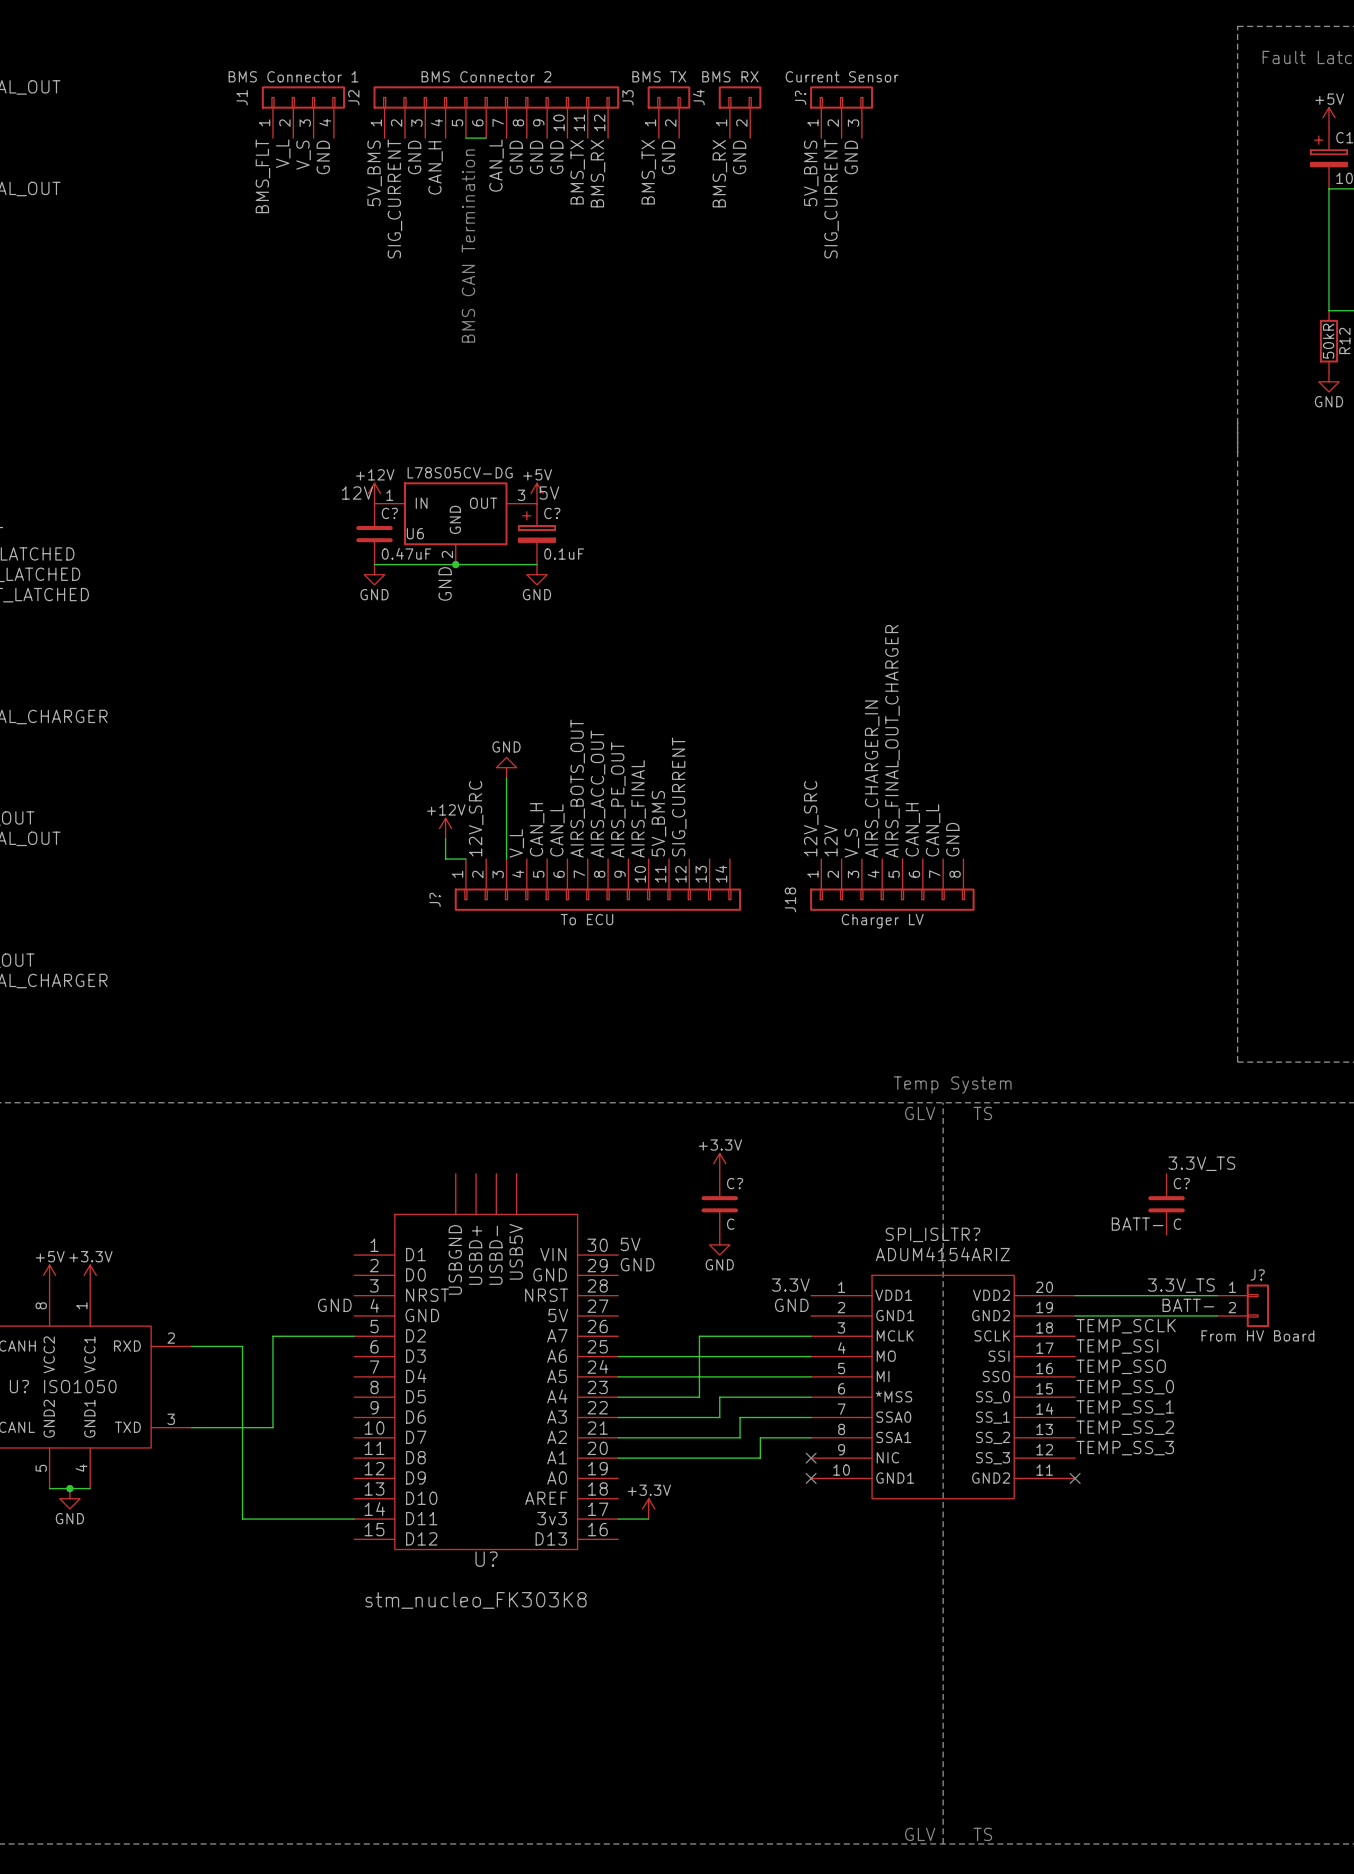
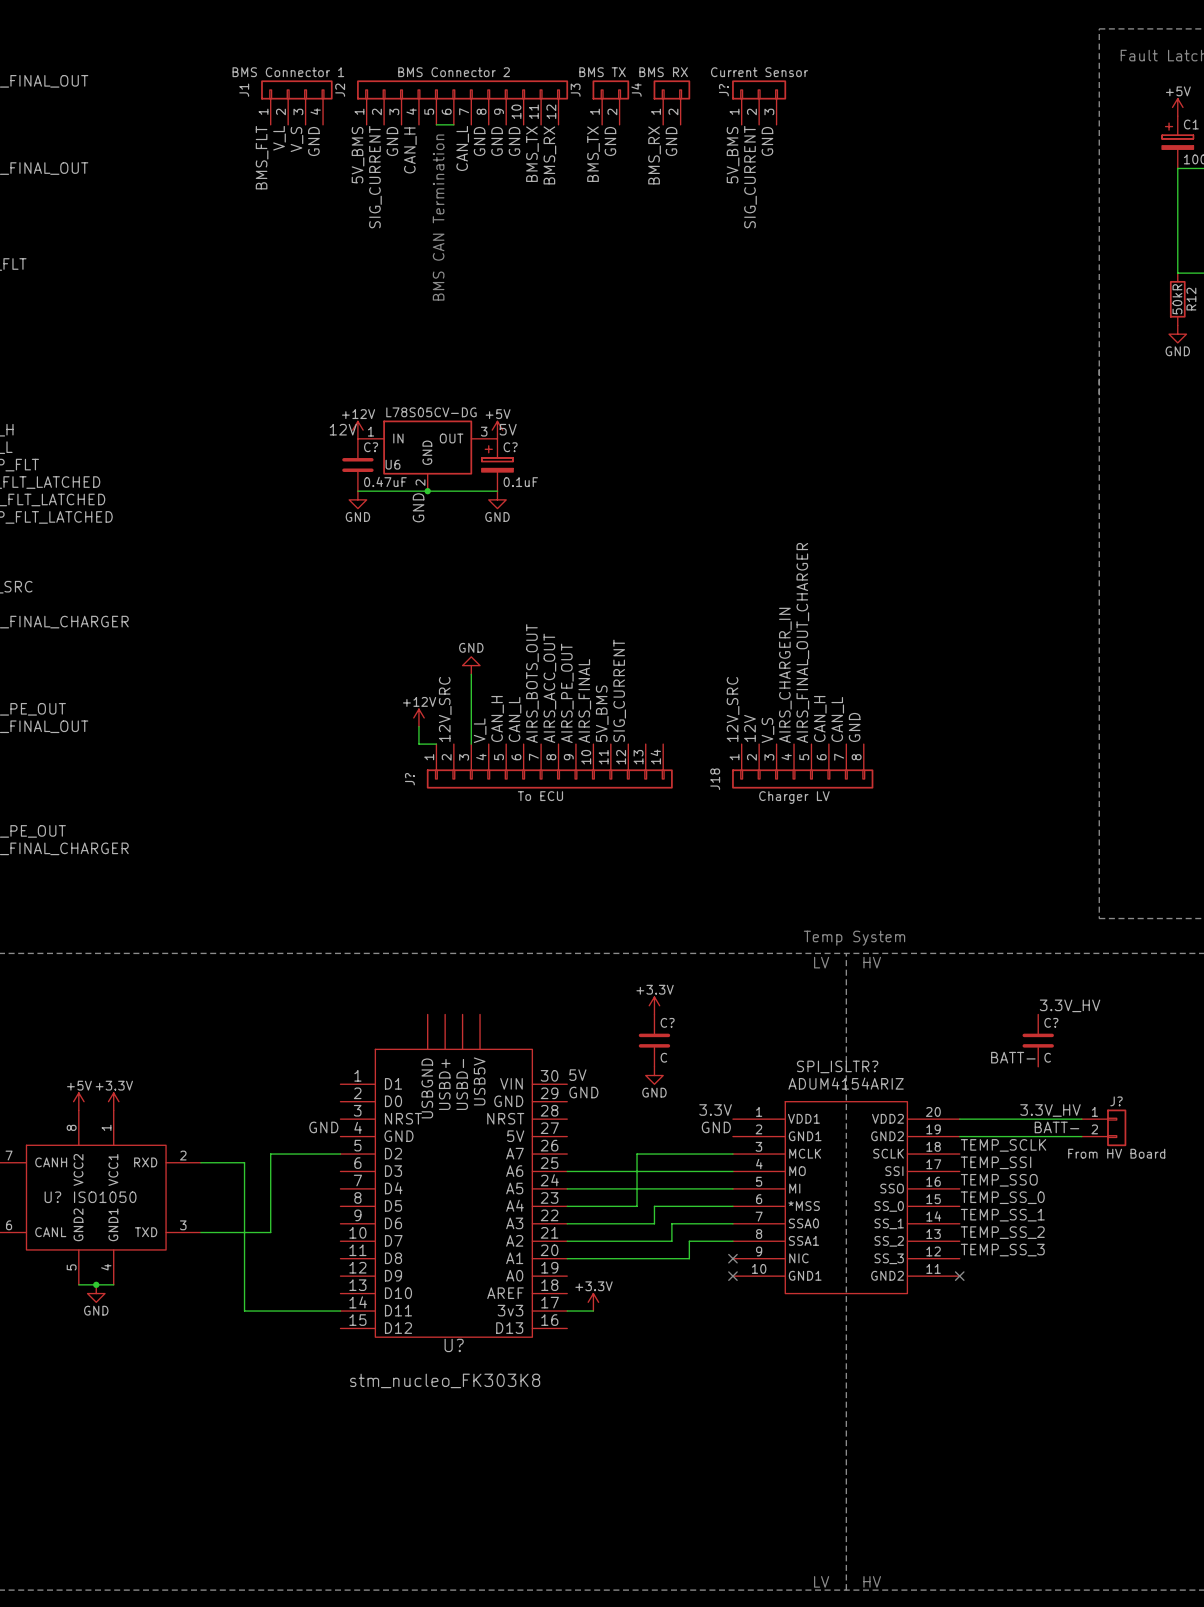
text: GLV TS (948, 1113) -> LV HV (847, 962)
label: 3.3V_TS (1201, 1163) -> 3.3V_HV (1070, 1005)
label: 3.3V_TS (1181, 1285) -> 3.3V_HV (1050, 1110)
text: GLV TS (948, 1834) -> LV HV (847, 1581)

